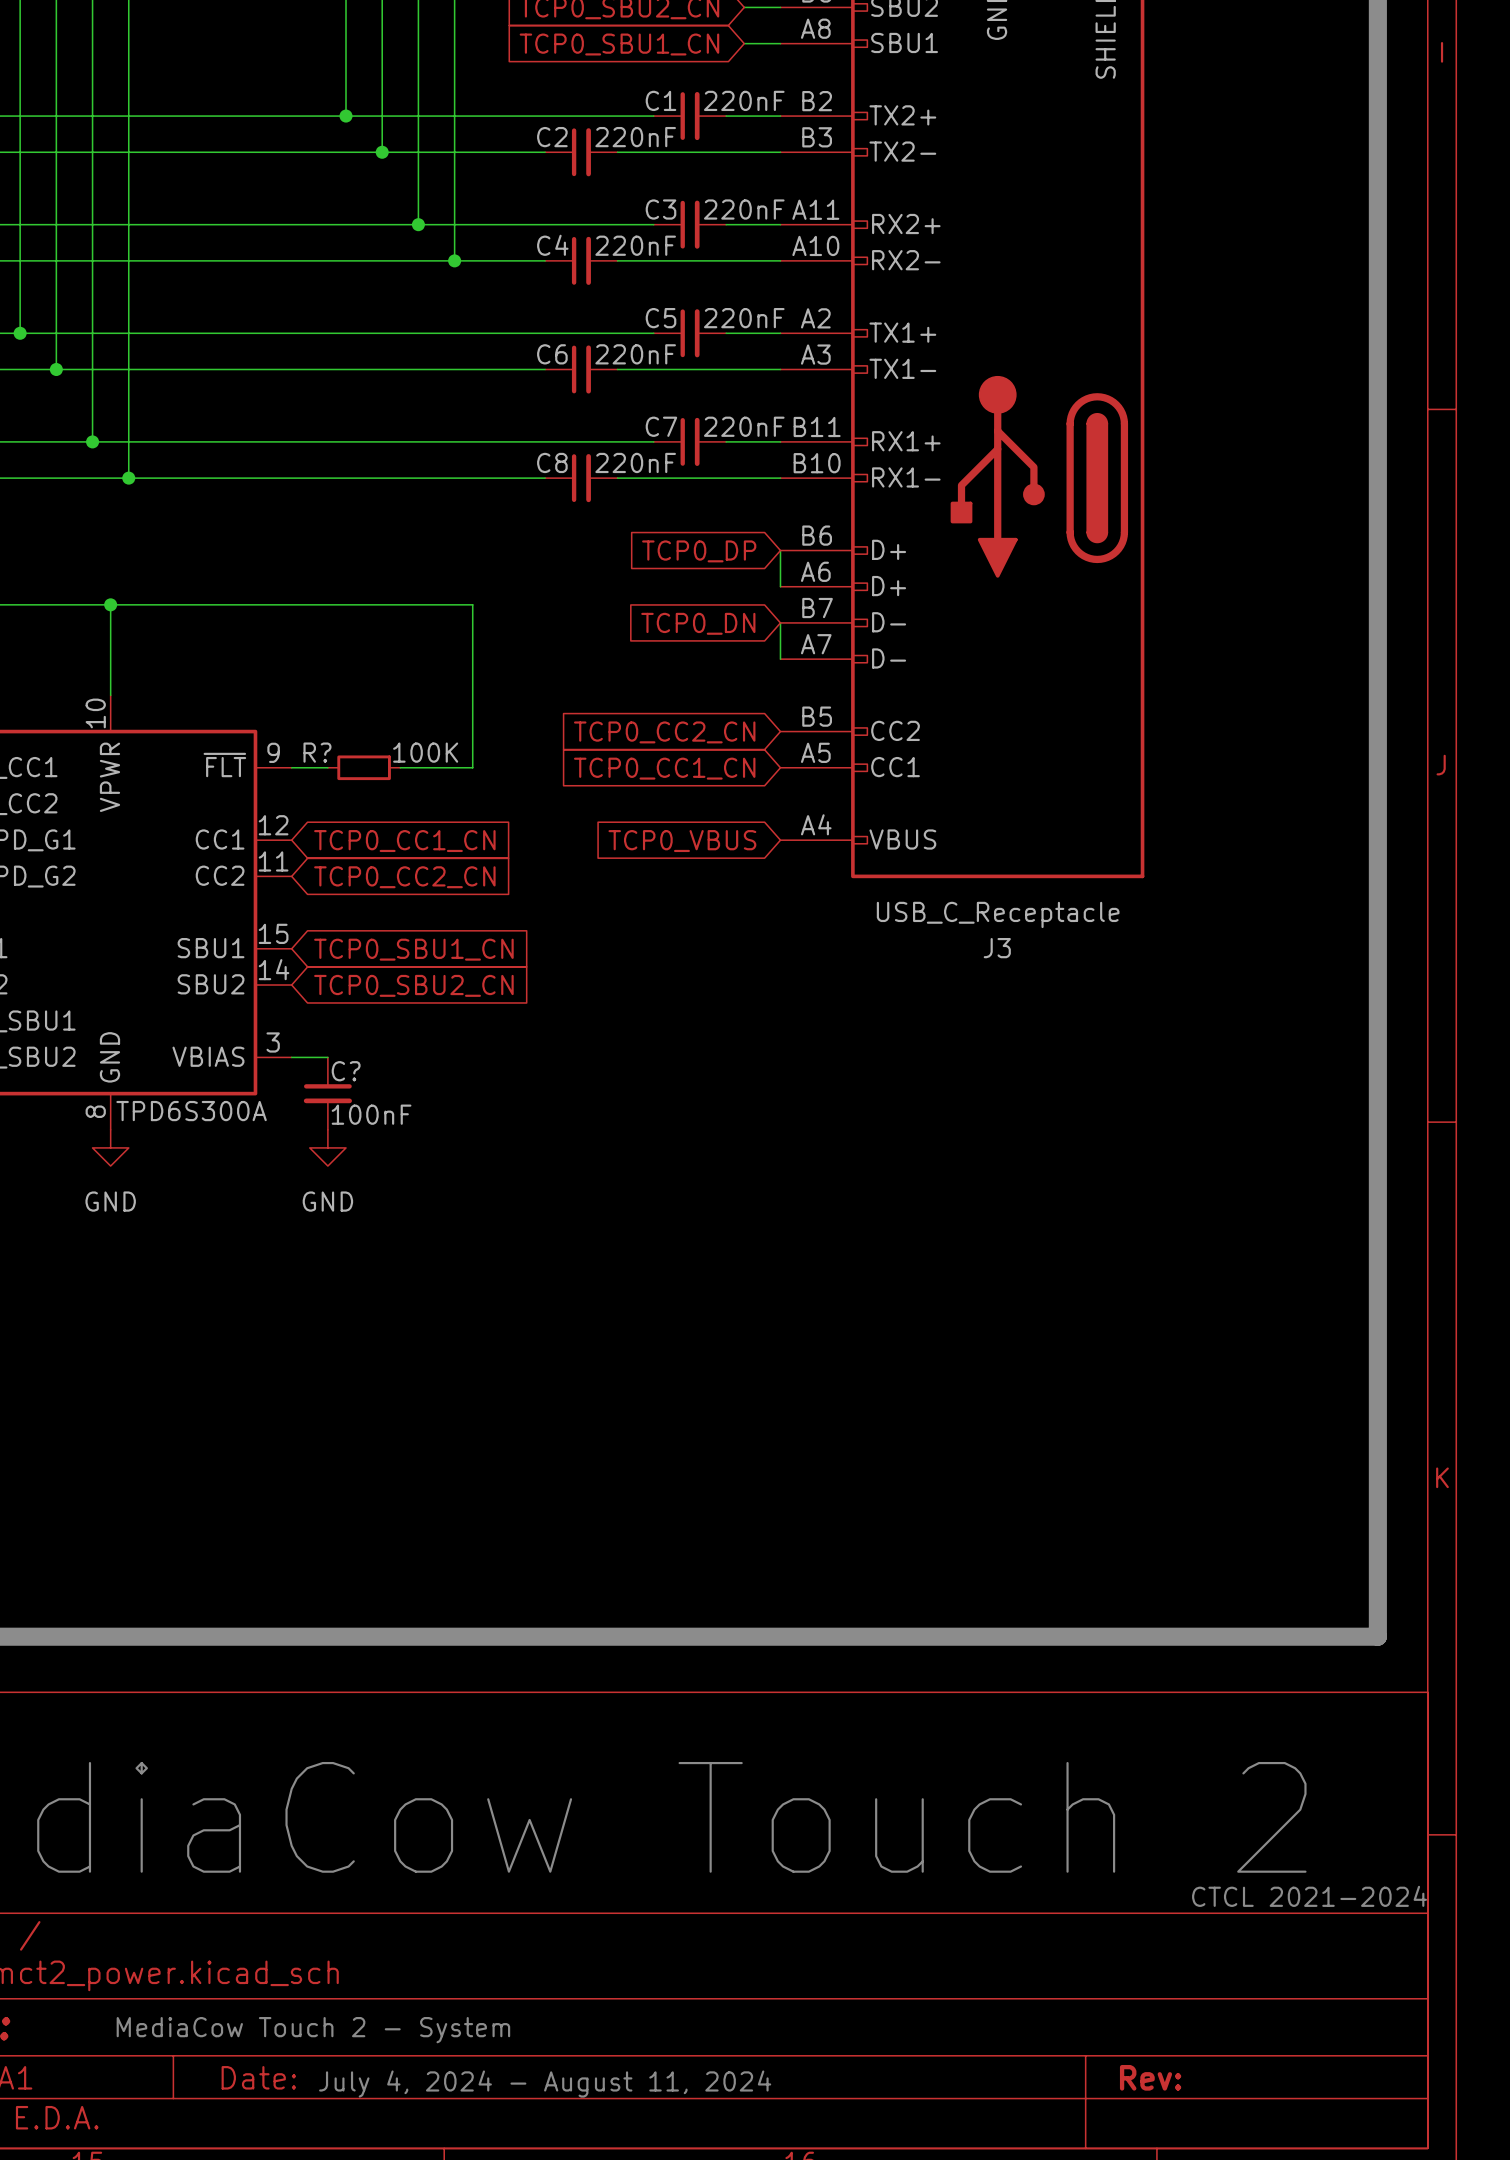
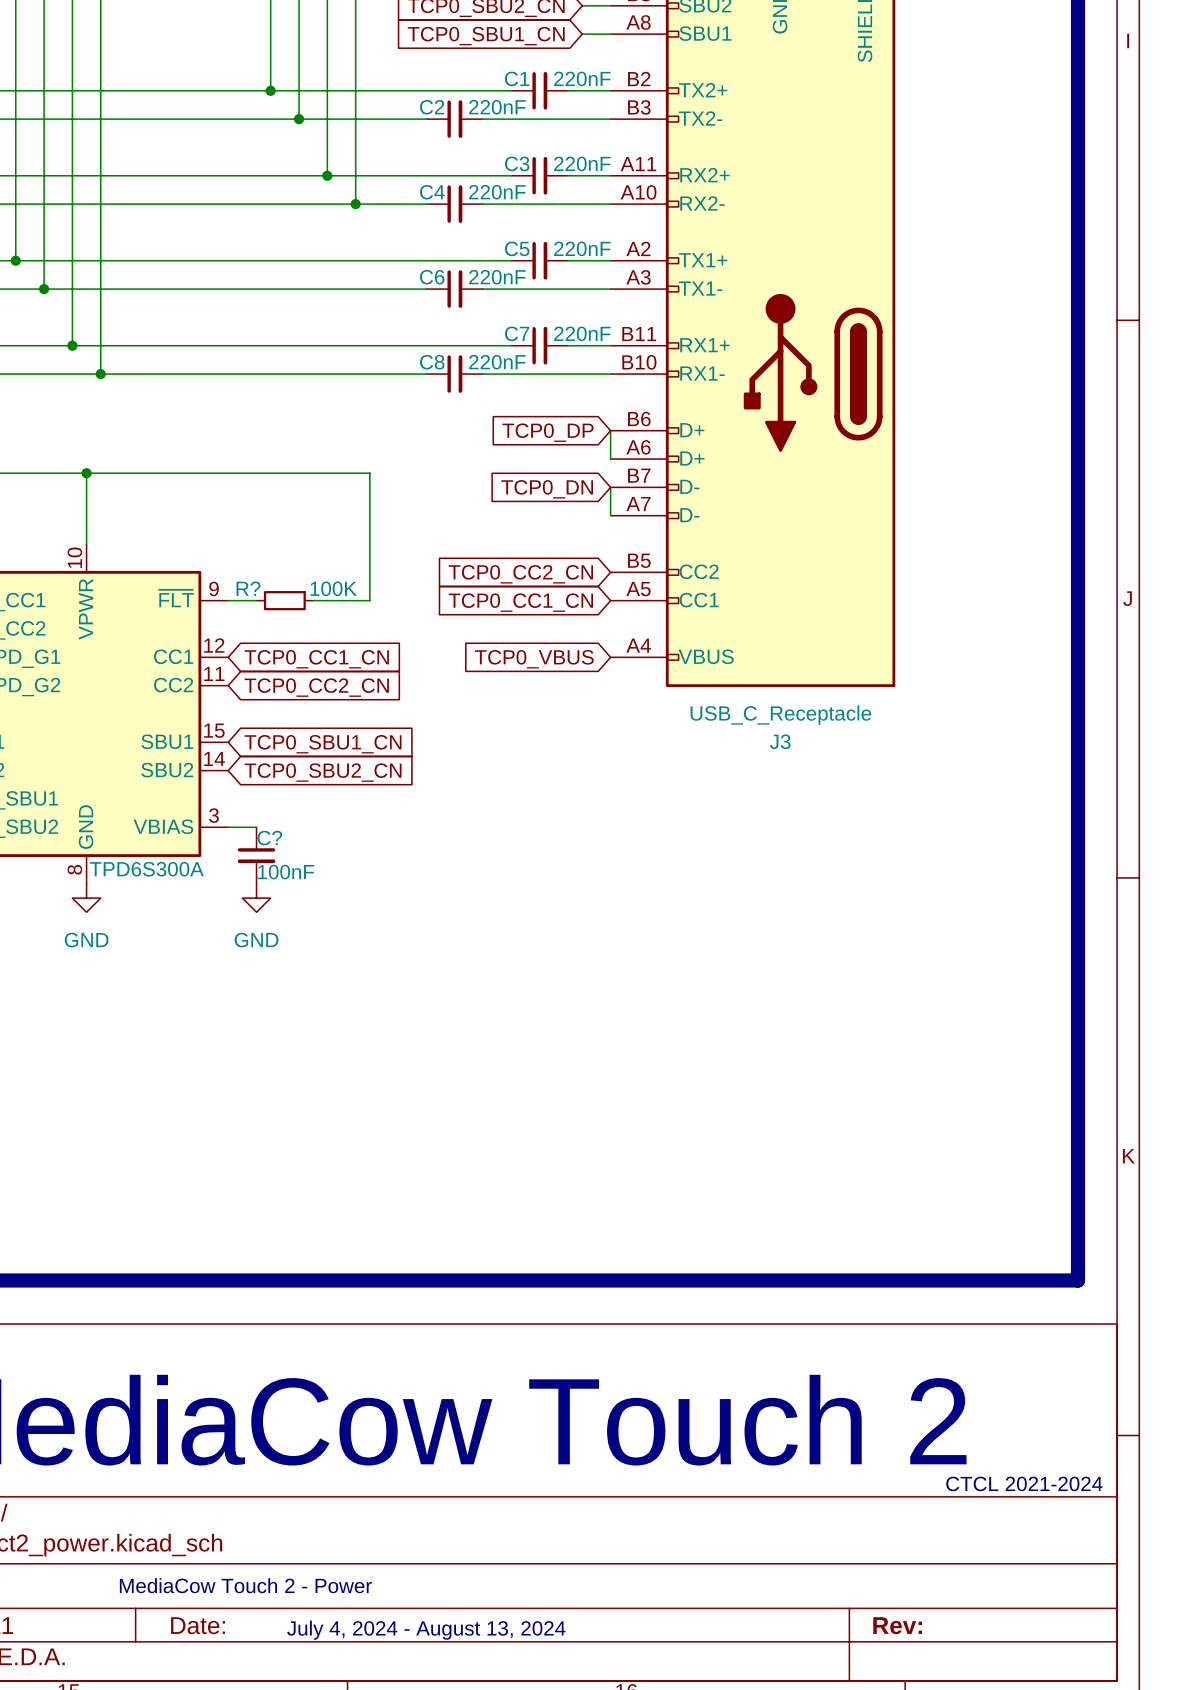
text: MediaCow Touch 2 - System (313, 2030) -> MediaCow Touch 2 - Power (245, 1585)
text: July 4, 2024 - August 11, 2024 (545, 2084) -> July 4, 2024 - August 13, 2024 (426, 1630)

